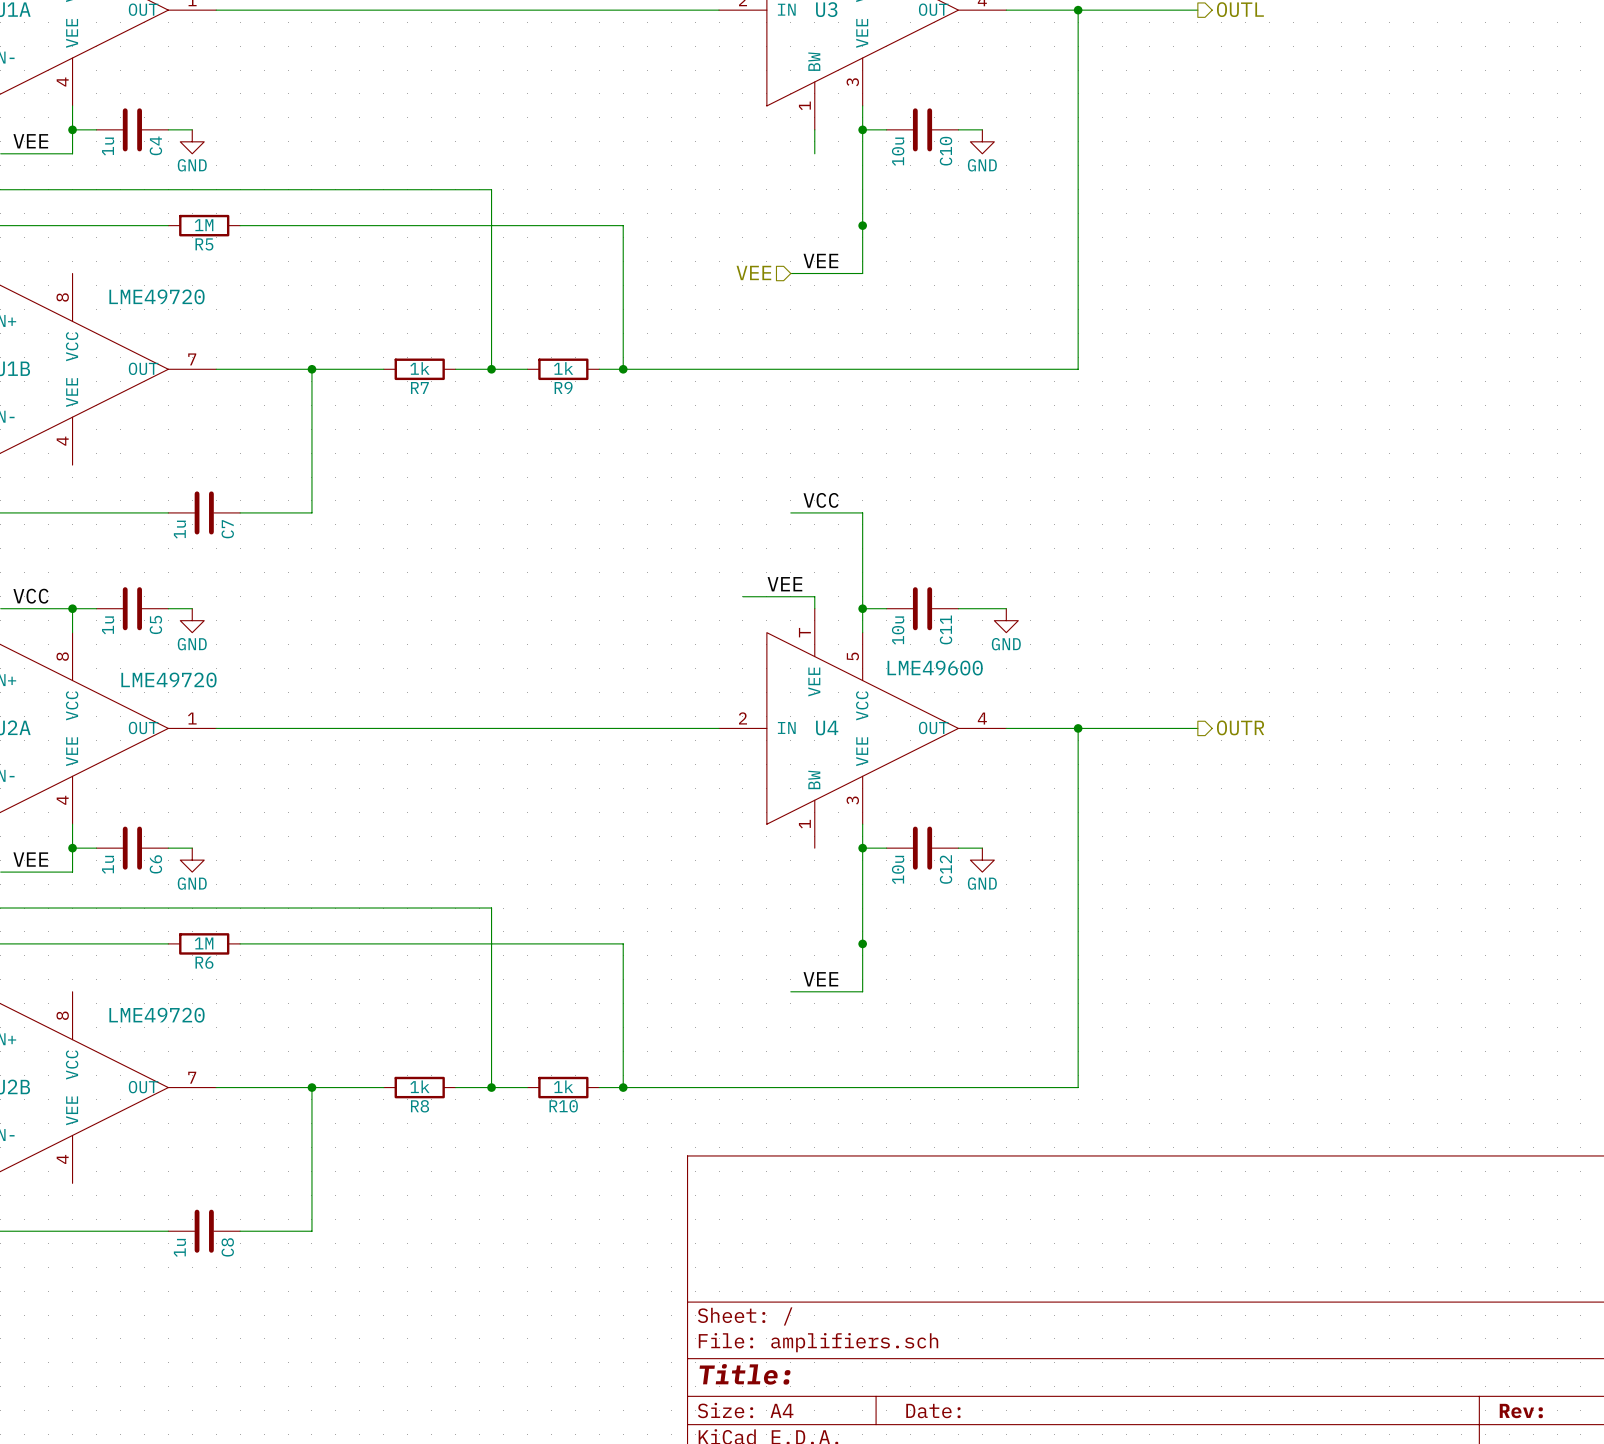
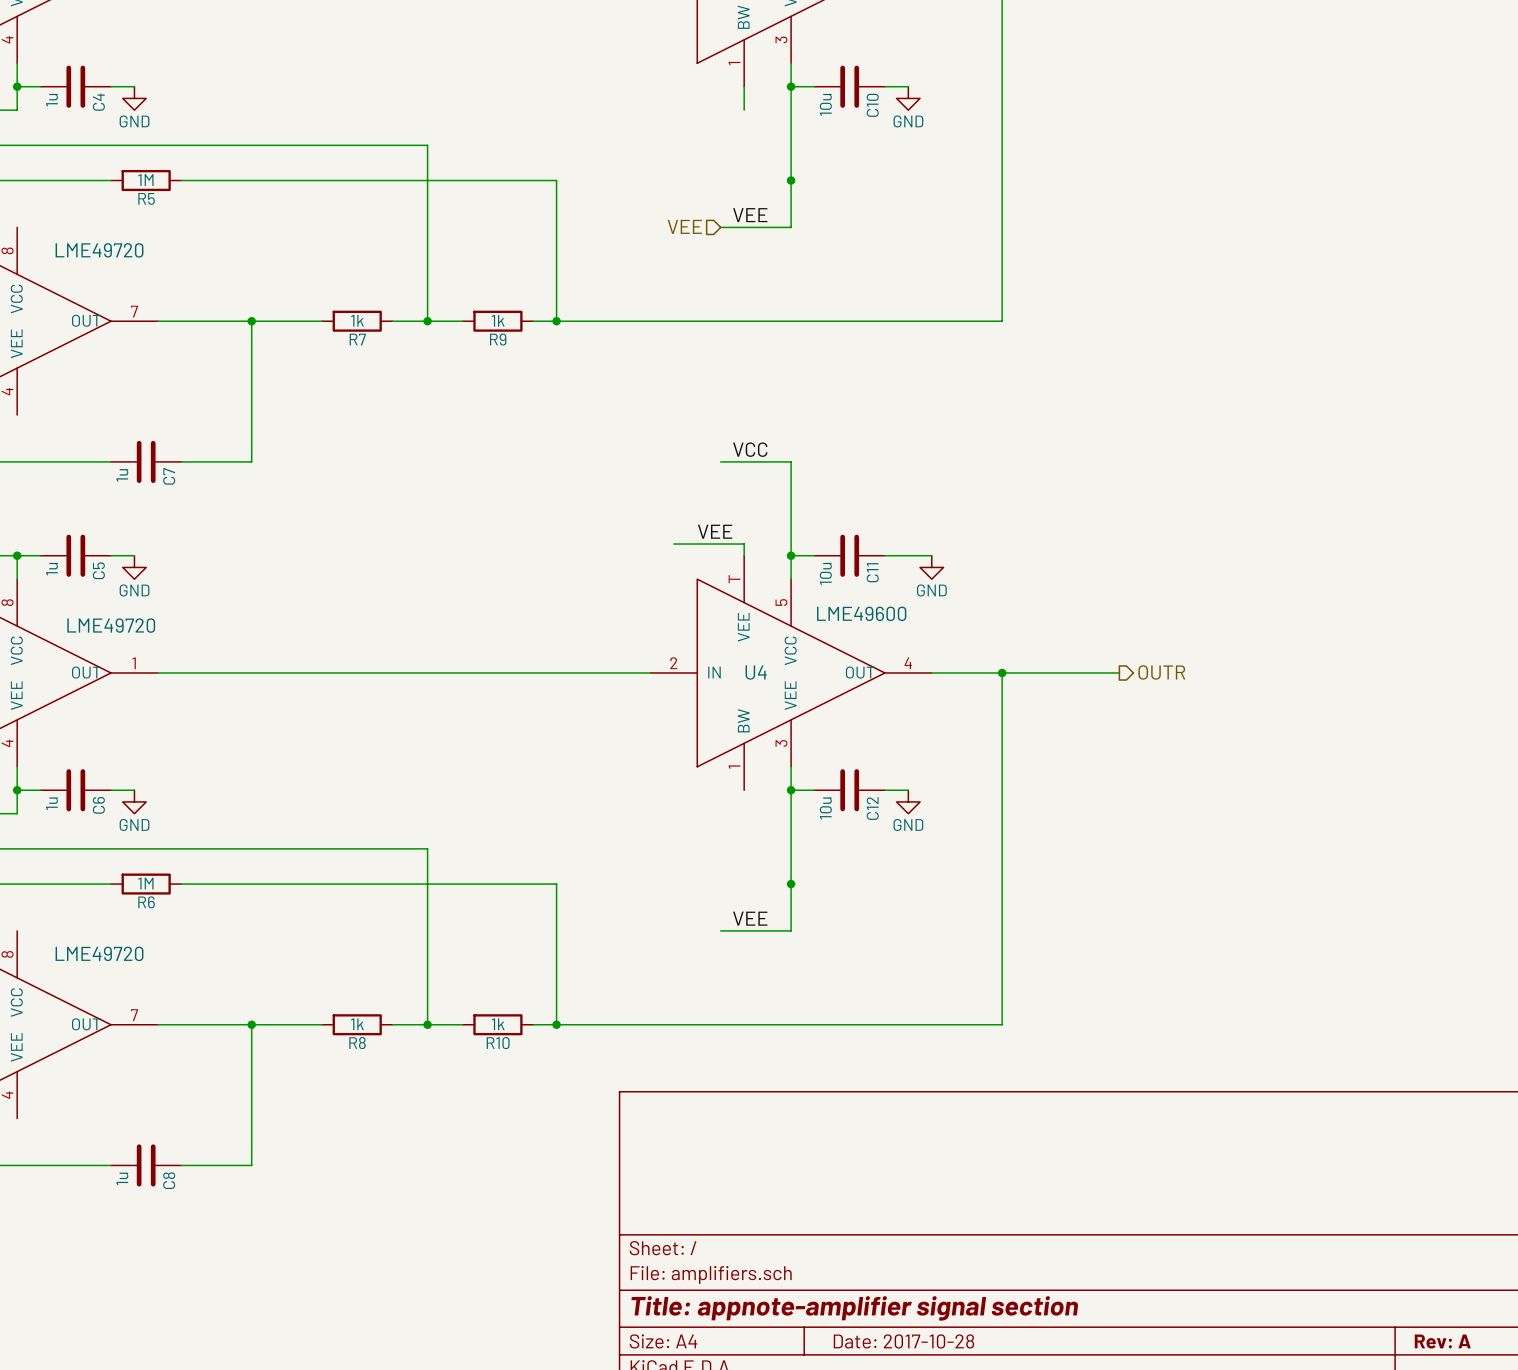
title block: Title: (745, 1374) -> Title: appnote-amplifier signal section (854, 1308)
title block: Date: (933, 1411) -> Date: 2017-10-28 (903, 1341)
title block: Rev: (1521, 1411) -> Rev: A (1442, 1341)

